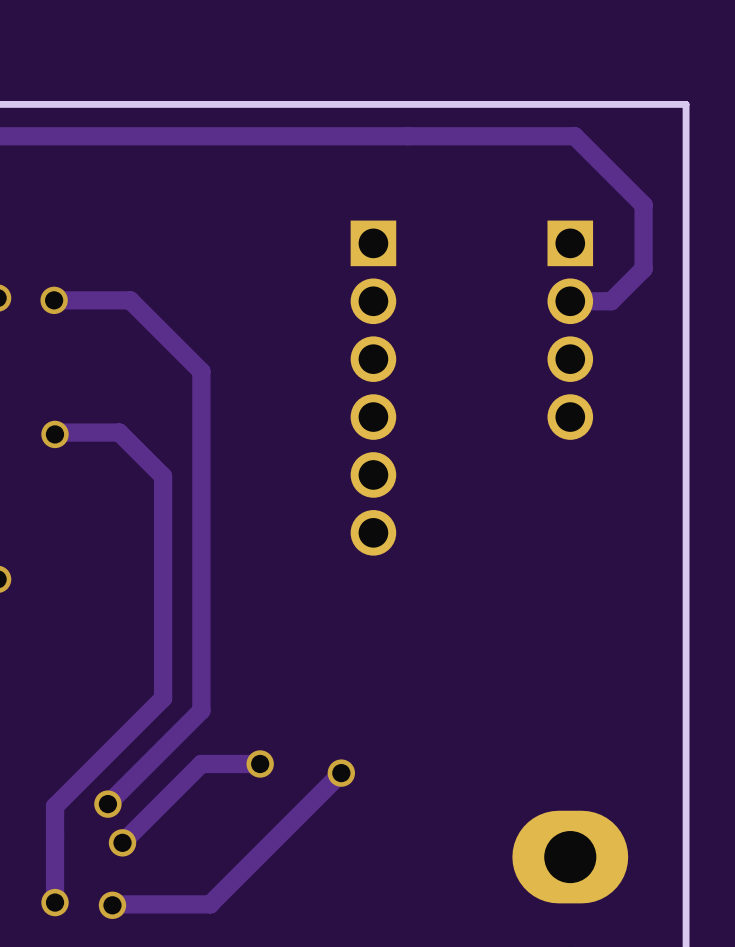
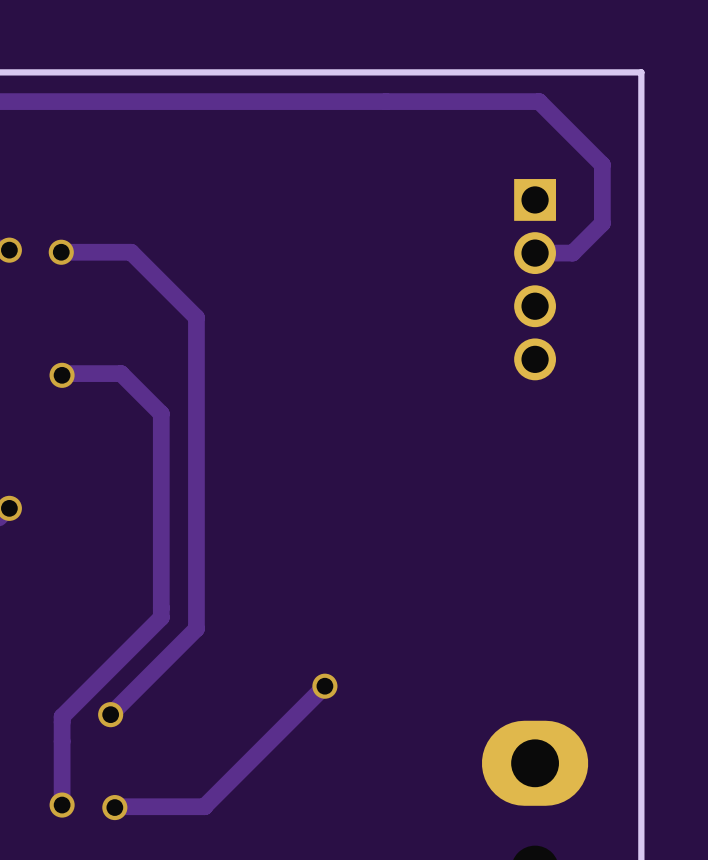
part: (373, 388) -> none
track: (260, 763) (201, 763) (122, 842) -> none
via: (260, 763) -> none
via: (122, 842) -> none

